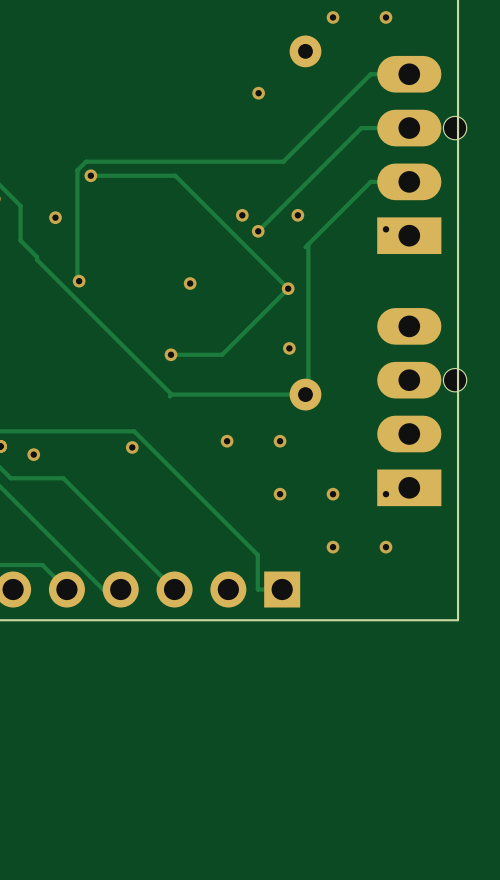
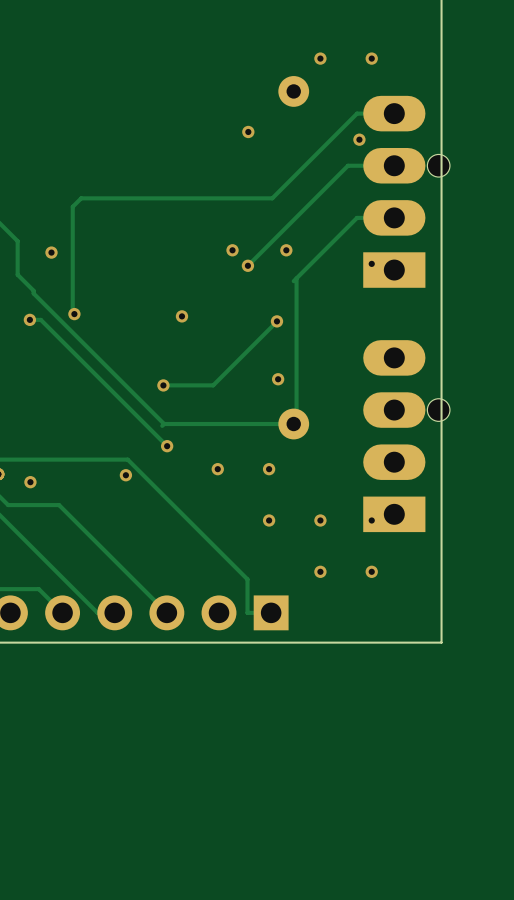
via: none -> (359, 139)
track: (90, 175) (175, 175) (288, 288) -> none
via: (90, 175) -> none
track: none -> (29, 319) (40, 319) (167, 446)
via: none -> (29, 319)
via: none -> (167, 446)

